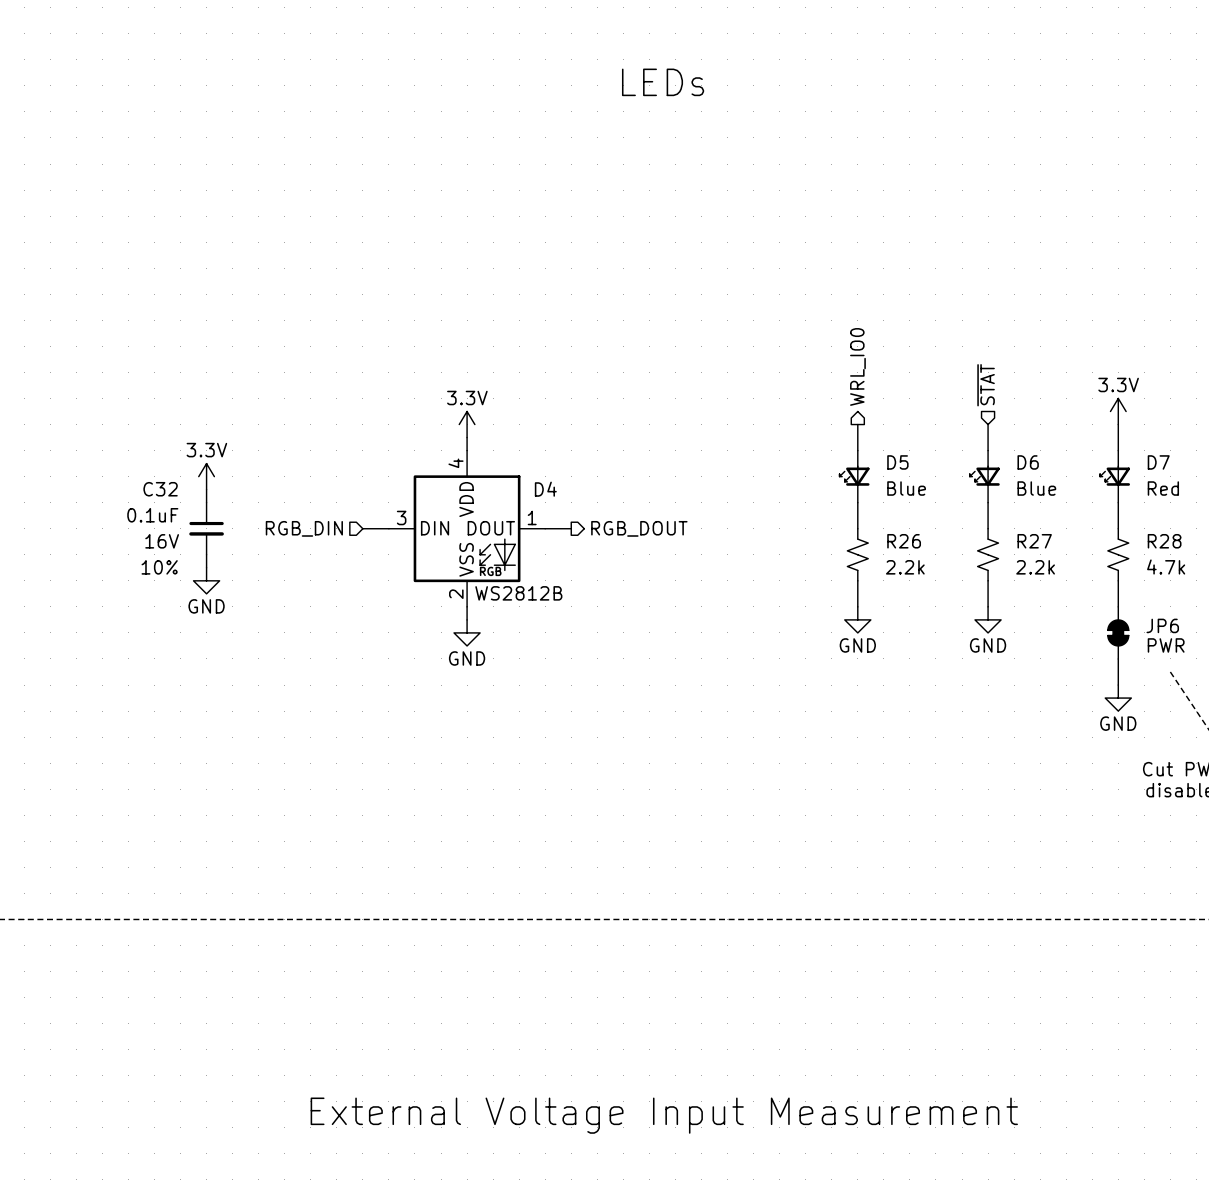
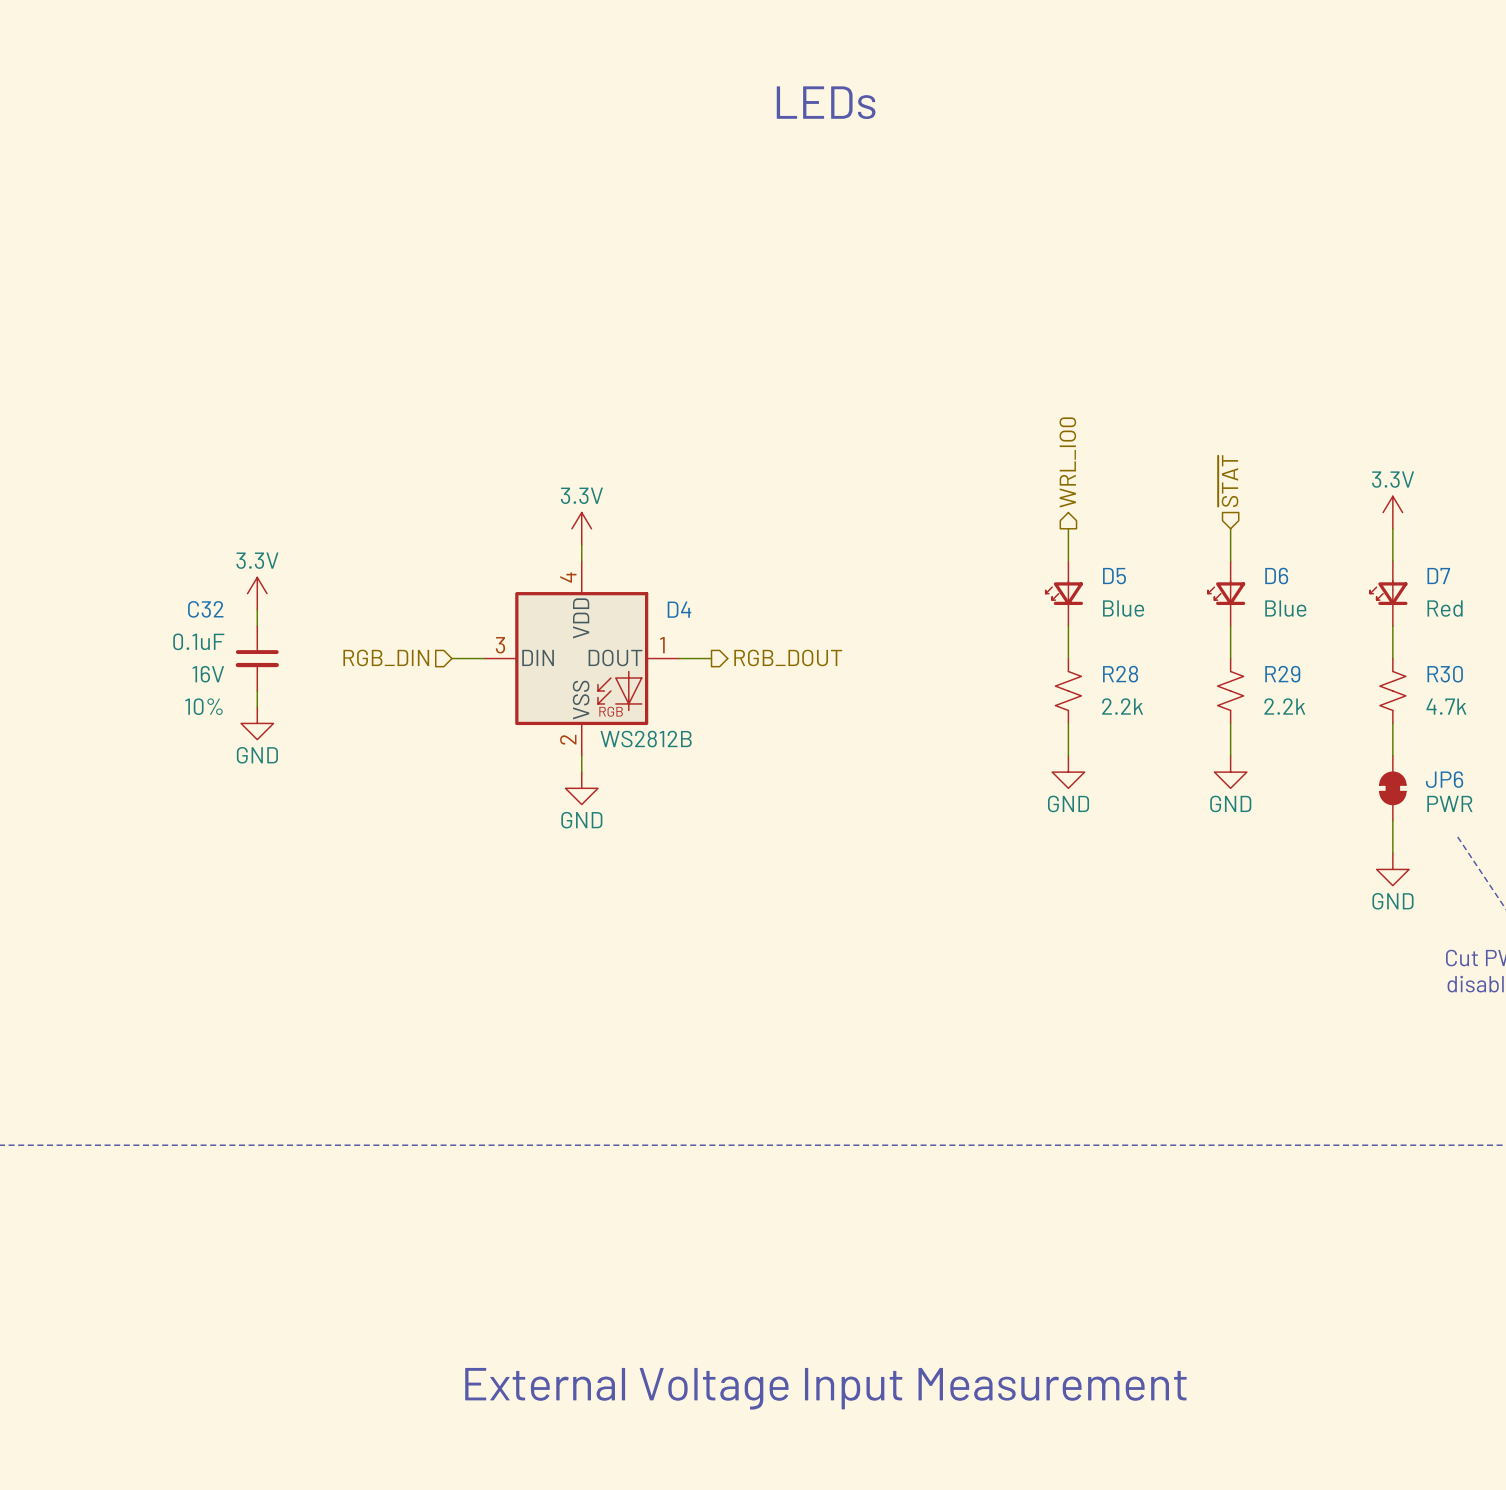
R26 name: R26 (904, 541) -> R28 (1120, 674)
R27 name: R27 (1034, 541) -> R29 (1282, 674)
R28 name: R28 (1164, 541) -> R30 (1445, 674)

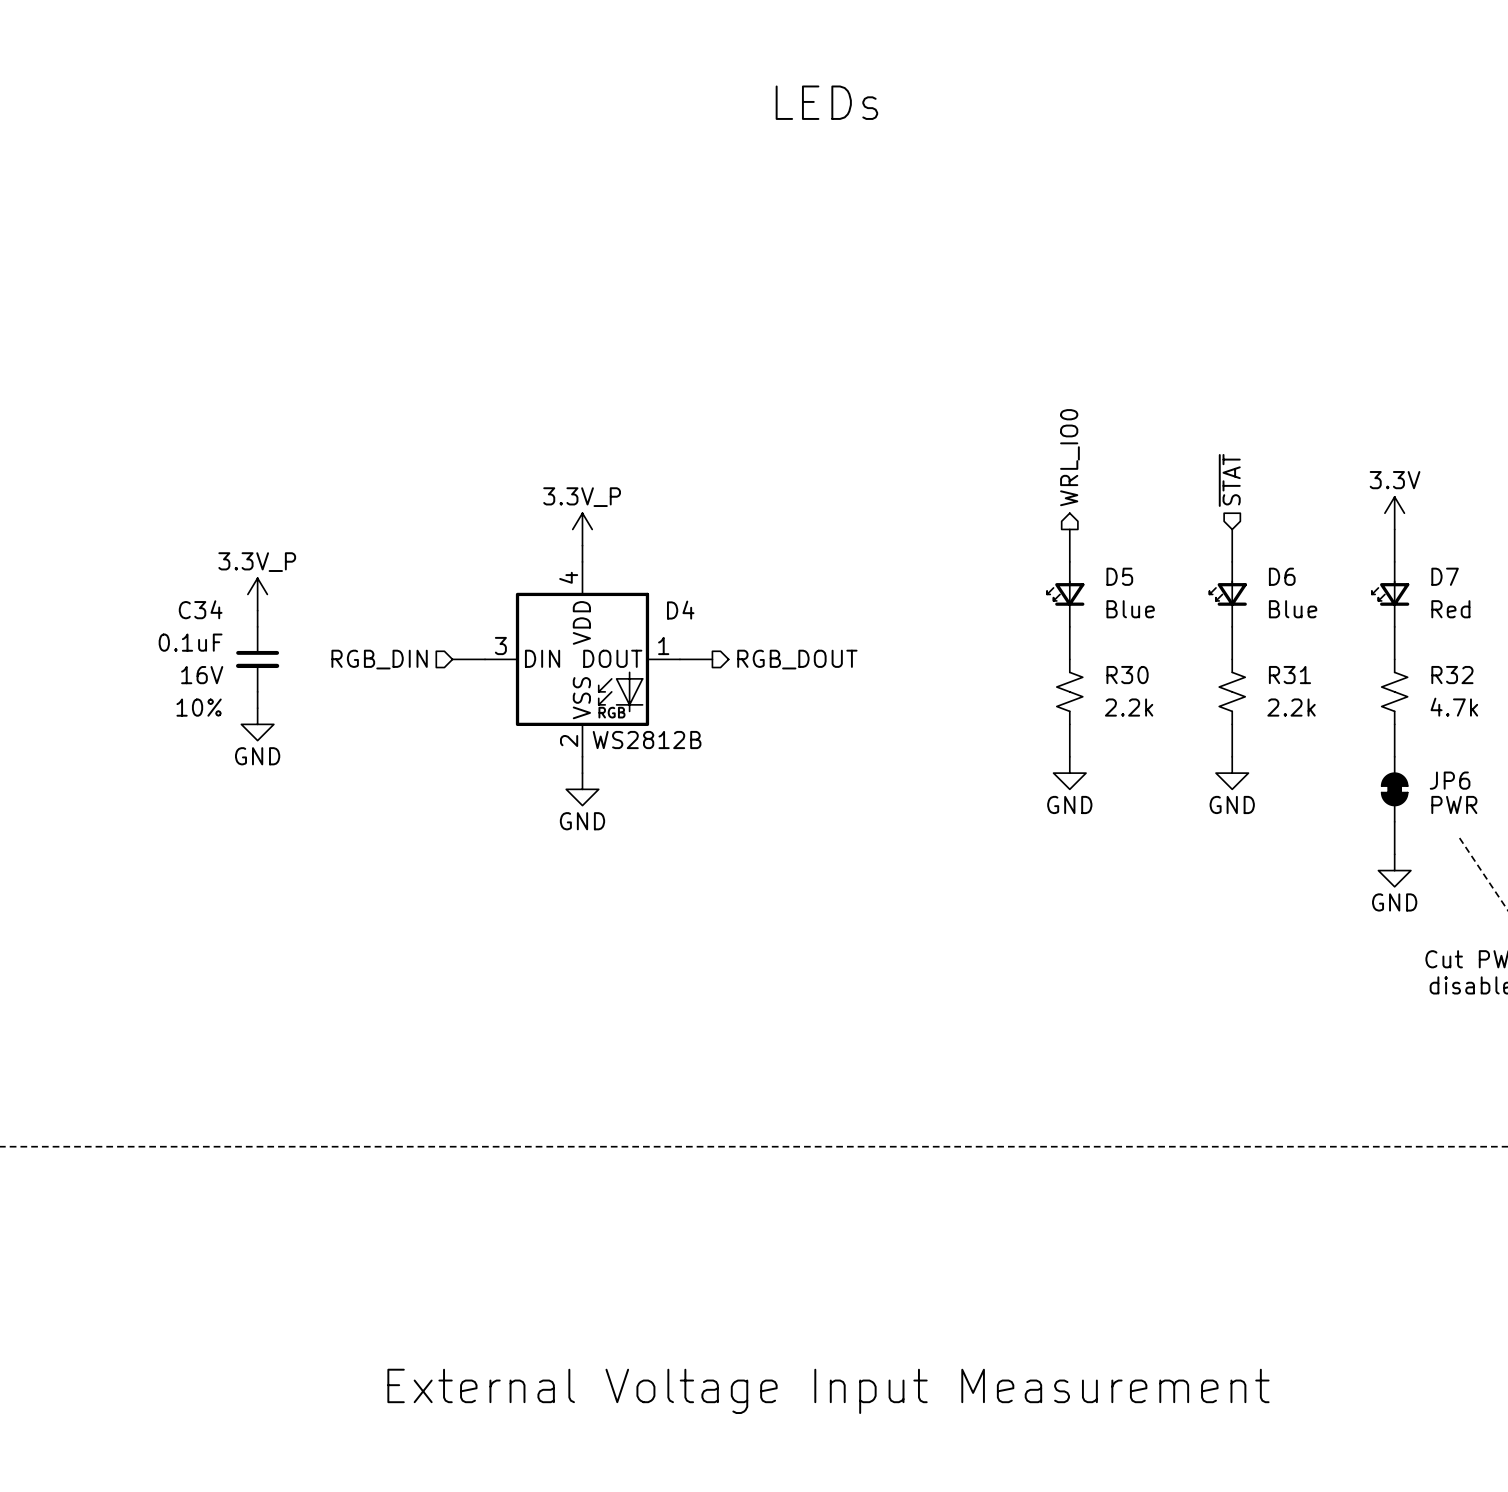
power symbol: 3.3V (581, 528) -> 3.3V_P (582, 529)
power symbol: 3.3V (257, 593) -> 3.3V_P (257, 594)
C32 name: C32 (205, 609) -> C34 (200, 609)
R28 name: R28 (1120, 674) -> R30 (1127, 675)
R29 name: R29 (1282, 674) -> R31 (1289, 675)
R30 name: R30 (1445, 674) -> R32 (1452, 675)

